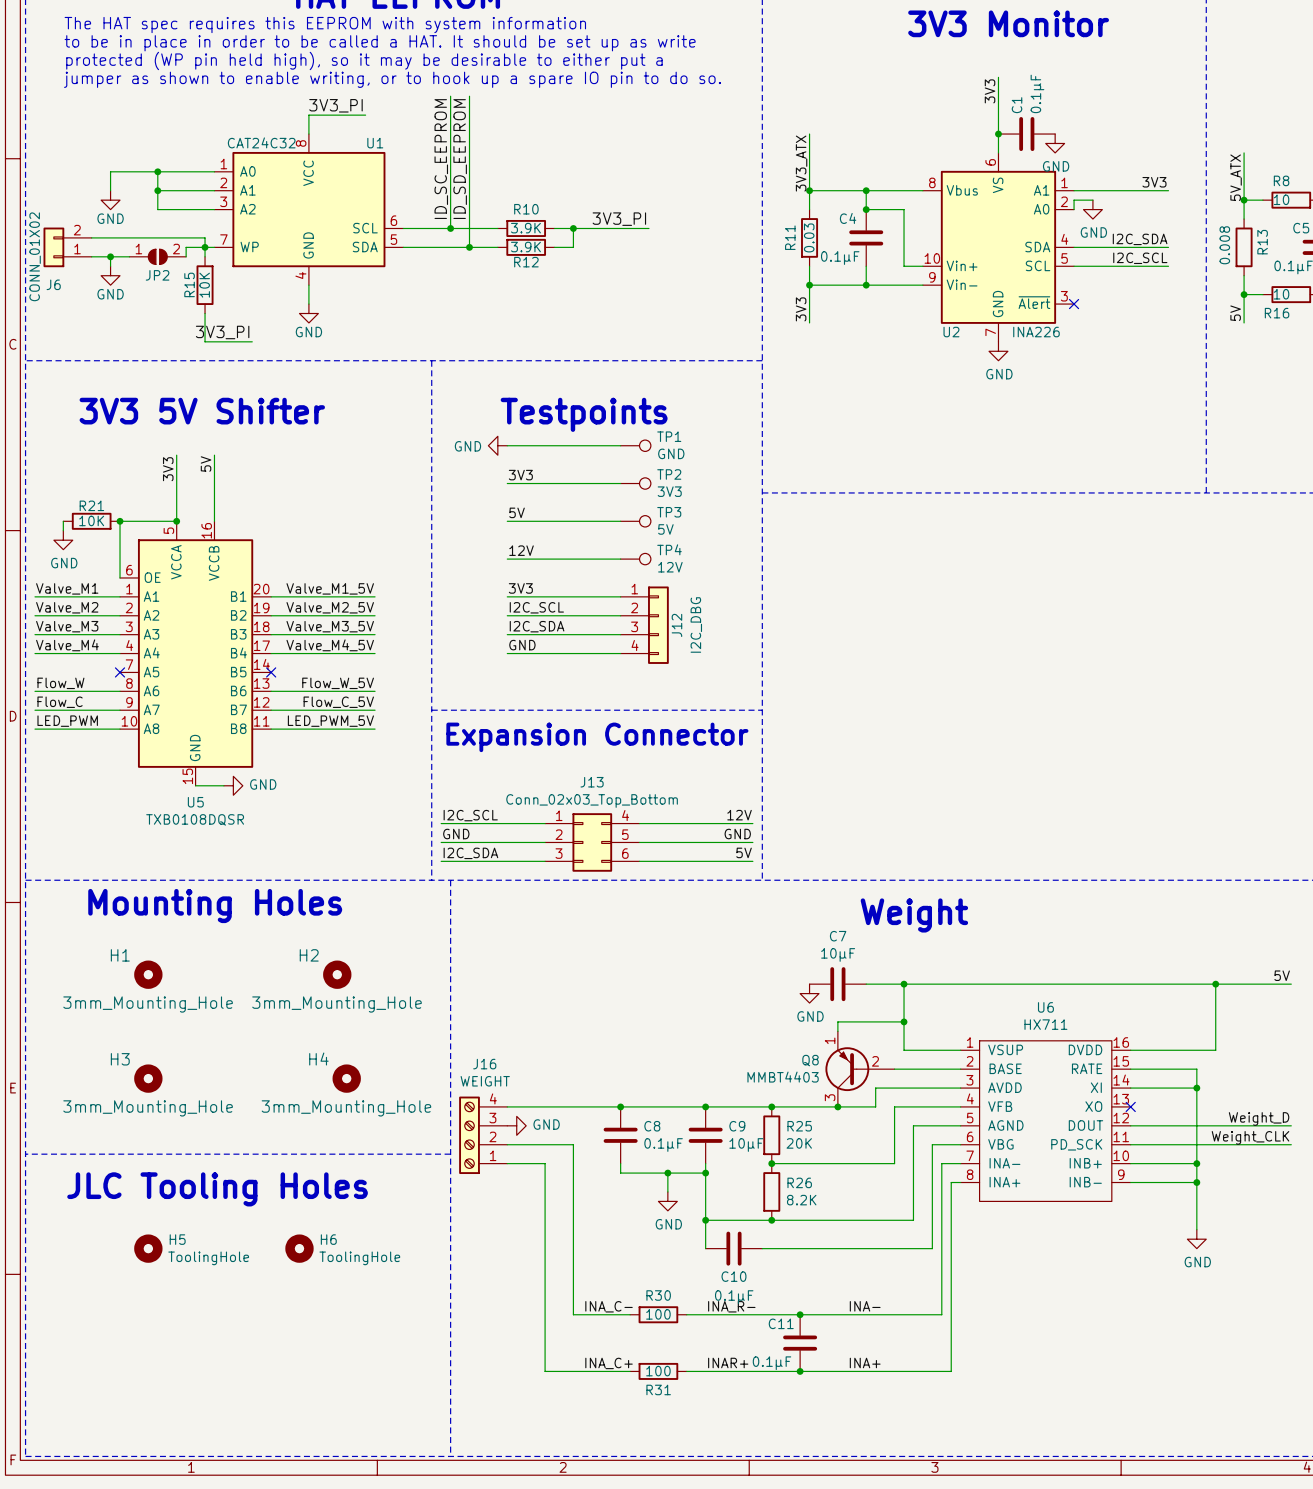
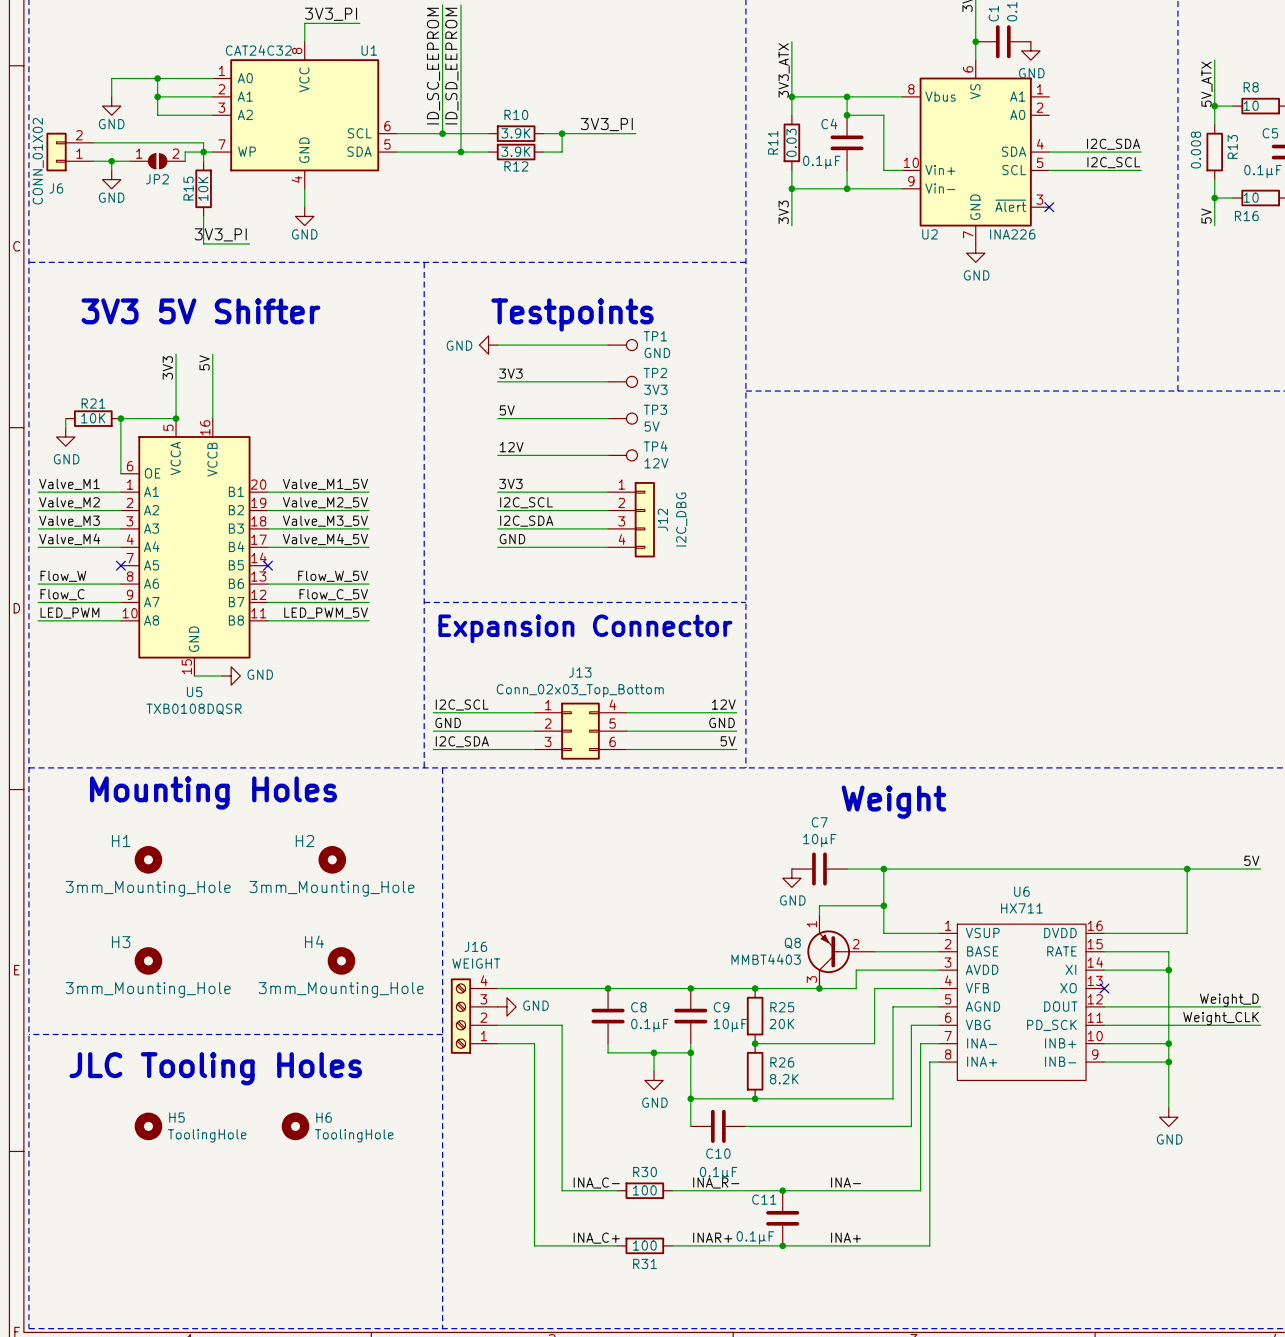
label: 3V3 (1154, 182) -> none
wire: (1074, 190) (1168, 190) -> none
wire: (1092, 200) (1074, 200) (1074, 209) -> none
power symbol: GND (1092, 209) -> none

